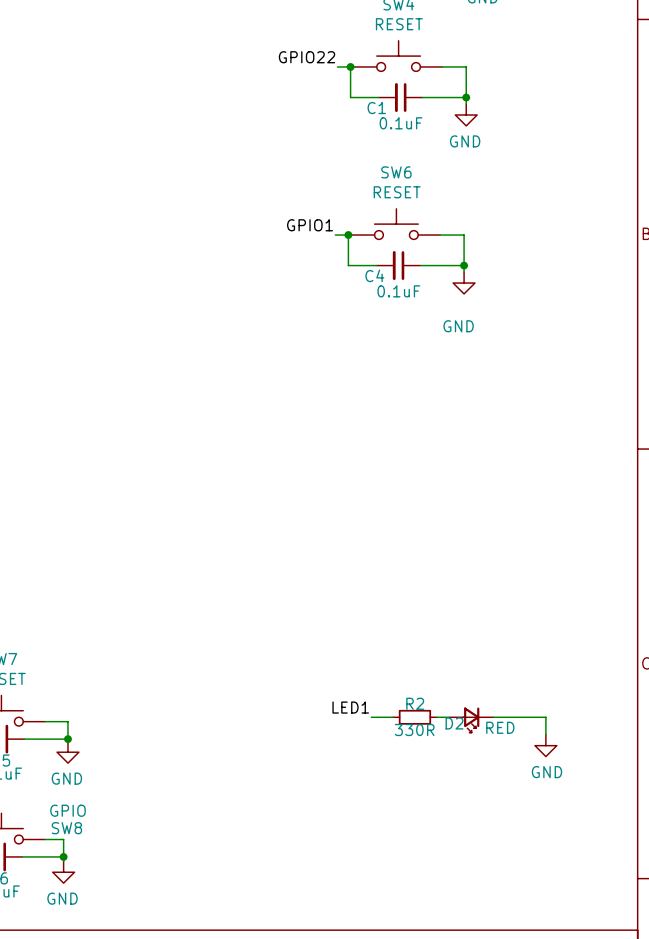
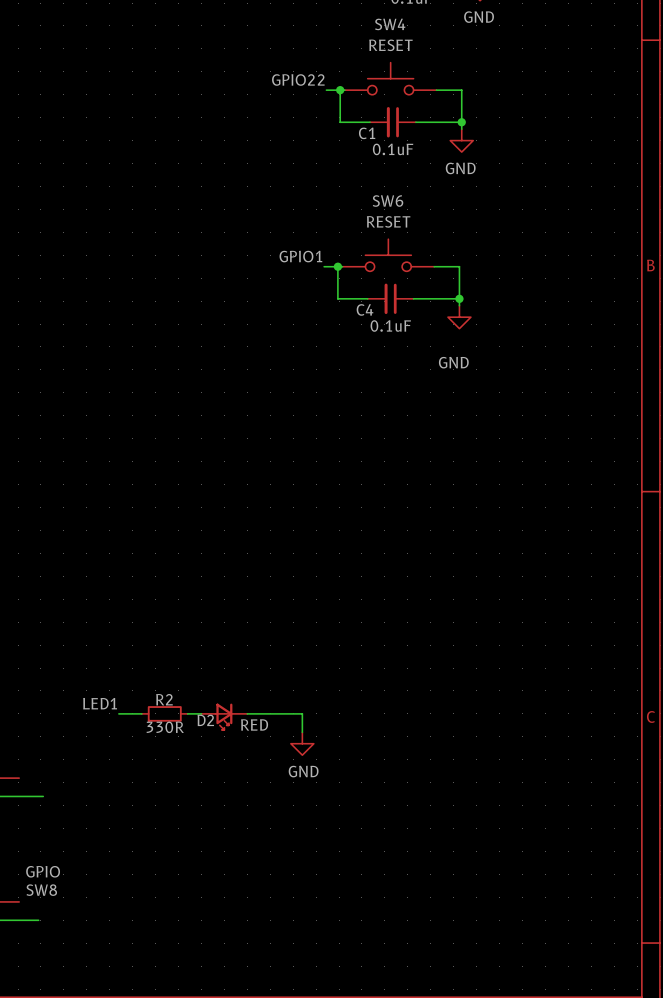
label: none -> LED1 (100, 703)
wire: none -> (118, 713) (141, 713)
wire: none -> (187, 713) (201, 713)
wire: none -> (247, 713) (302, 713) (302, 732)
power symbol: none -> GND (302, 743)
label: LED1 (350, 707) -> none
wire: (371, 717) (393, 717) -> none
R2 position: (414, 717) -> (164, 713)
wire: (436, 717) (449, 717) -> none
wire: (493, 717) (545, 717) (545, 734) -> none
D2 position: (471, 720) -> (224, 716)
wire: (45, 721) (67, 721) (67, 741) -> none
junction: (67, 739) -> none
power symbol: GND (545, 745) -> none
power symbol: GND (67, 752) -> none
wire: (45, 839) (63, 839) (63, 861) -> none
junction: (63, 856) -> none
power symbol: GND (63, 872) -> none

